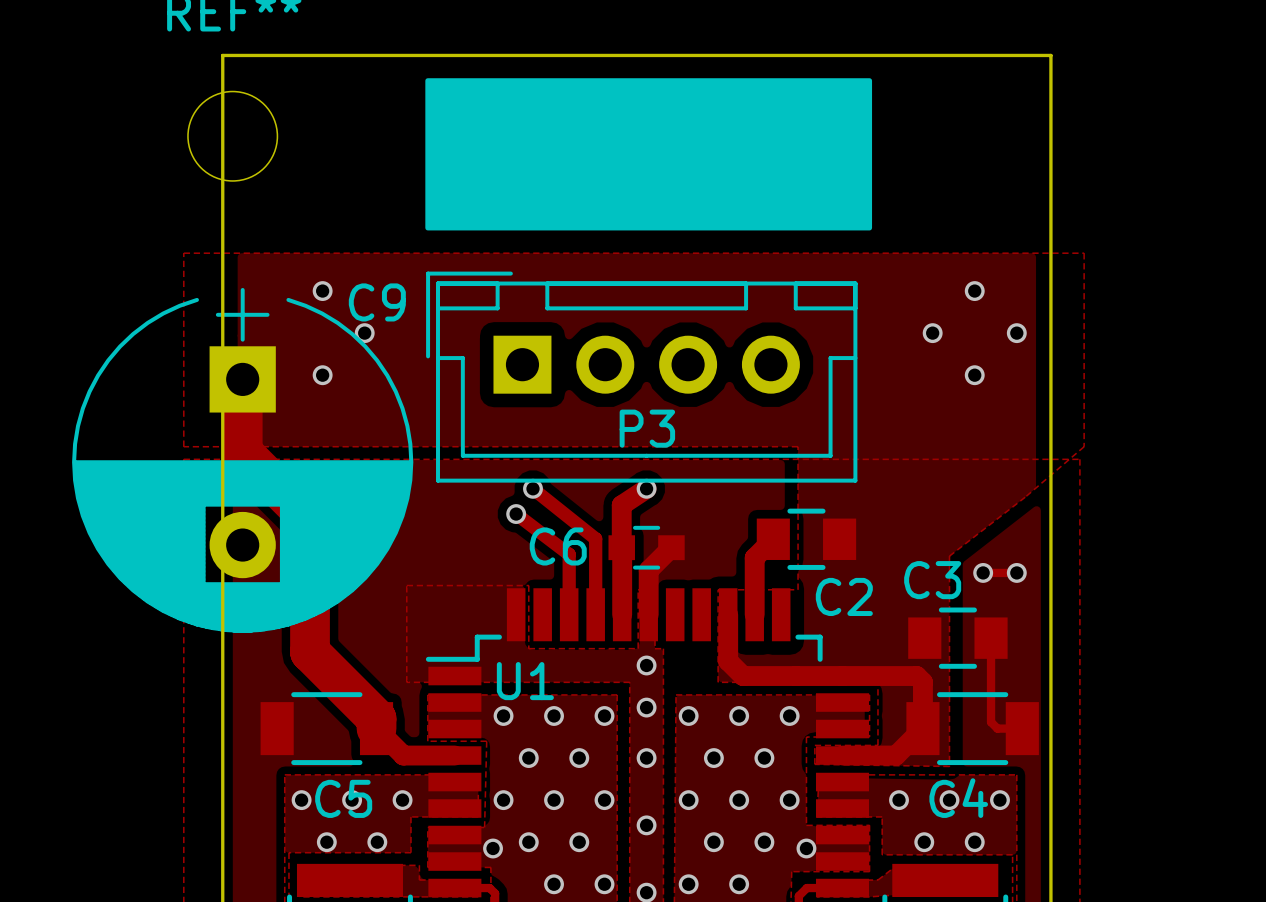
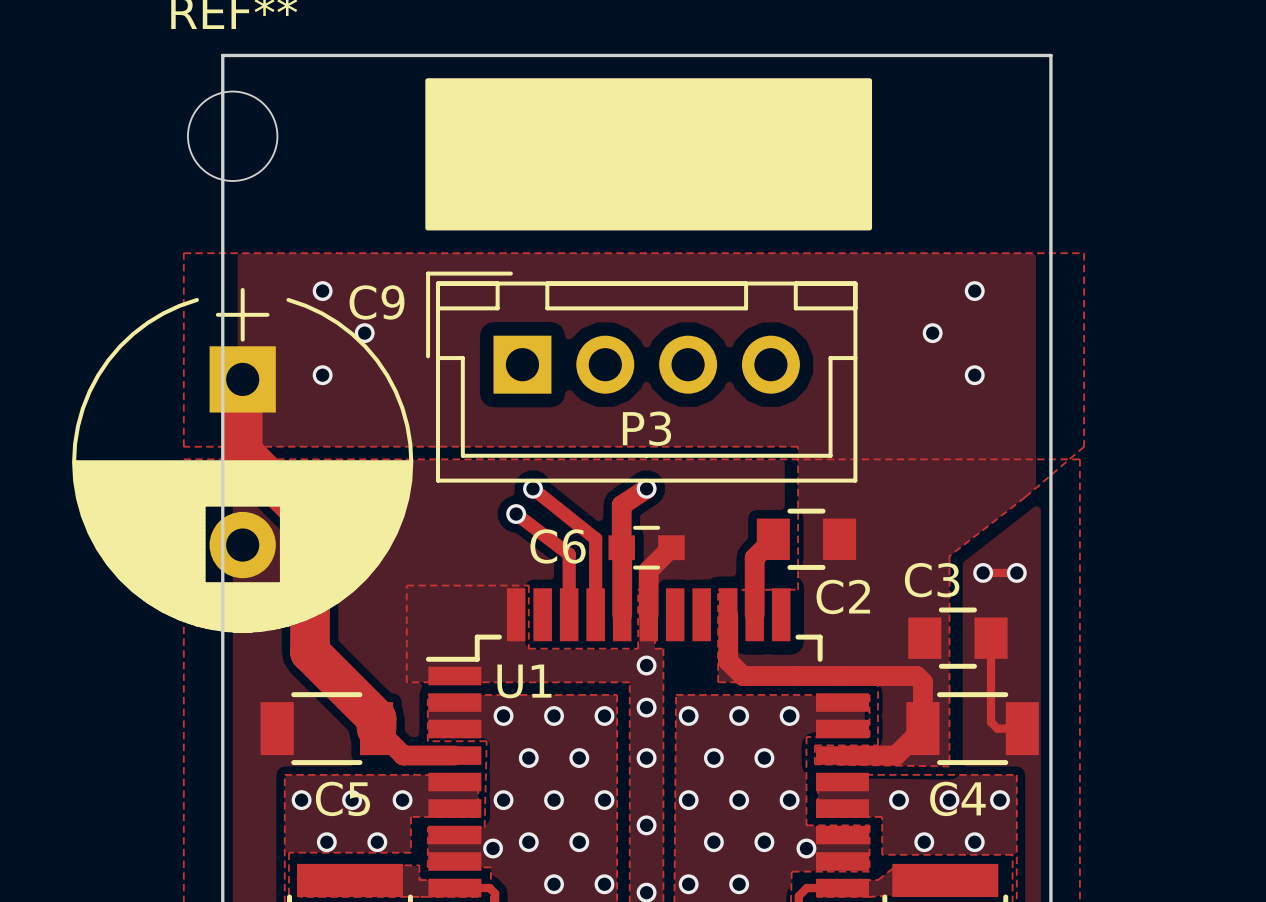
via: (1016, 333) -> none

